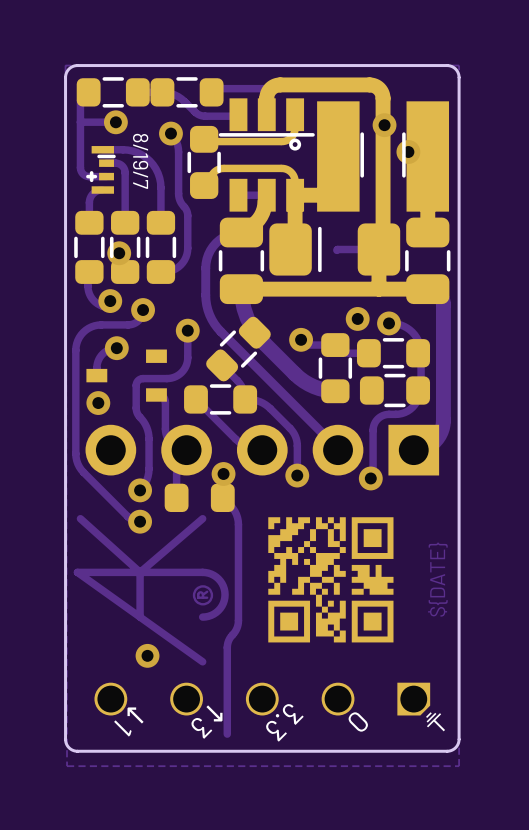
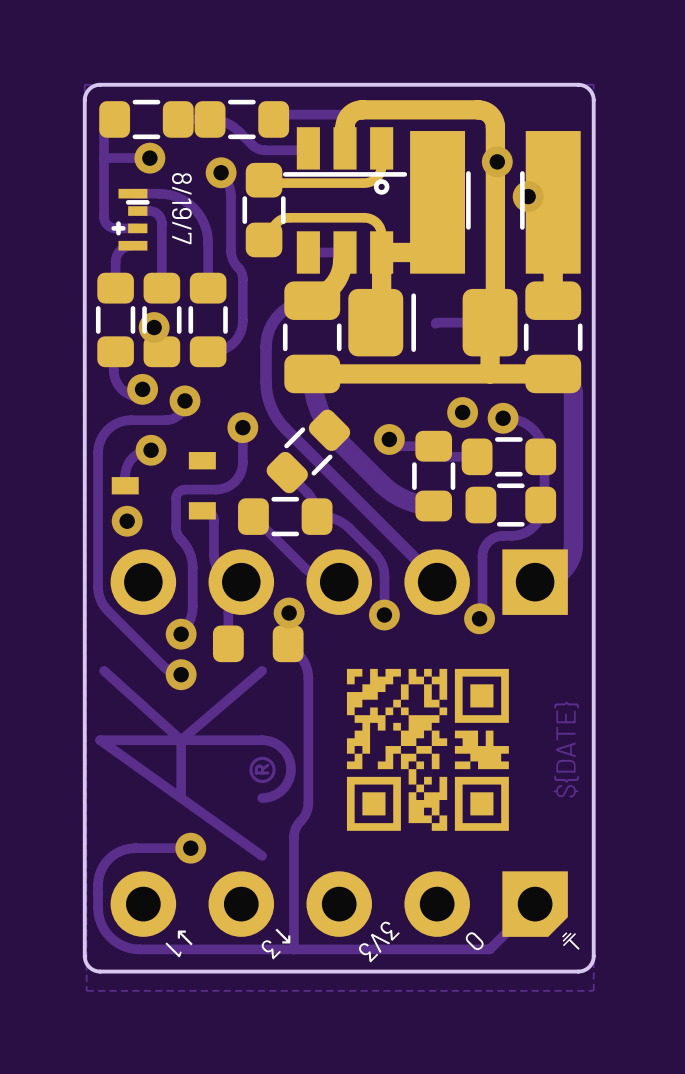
track: none -> (190, 848) (130, 848) (116, 853) (105, 862) (98, 880) (98, 913) (103, 928) (114, 940) (128, 947) (139, 949) (489, 949) (535, 904)
part footprint: [94, 682, 431, 716] -> [110, 871, 568, 937]

